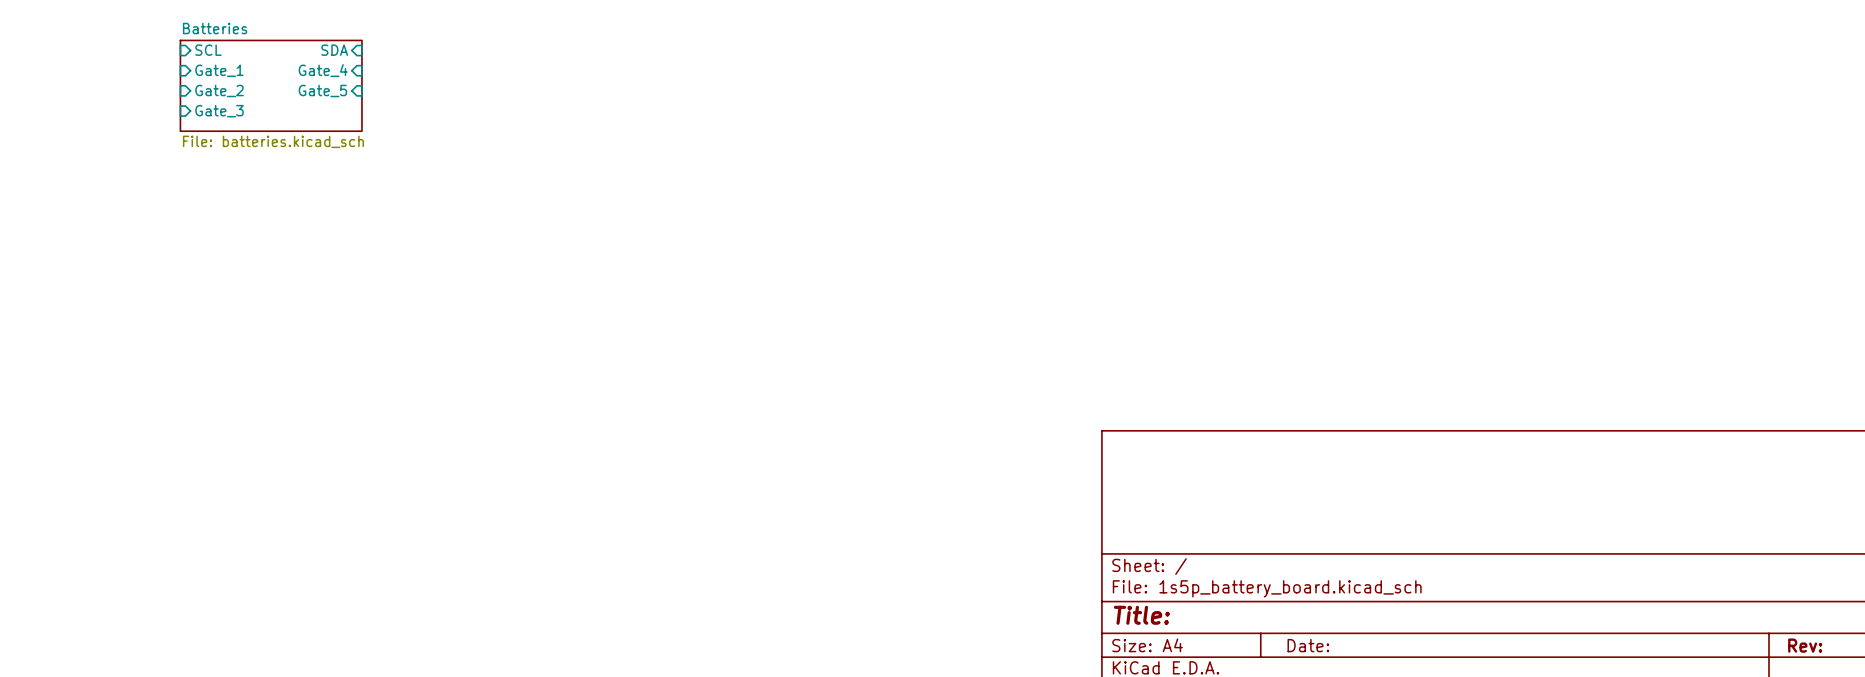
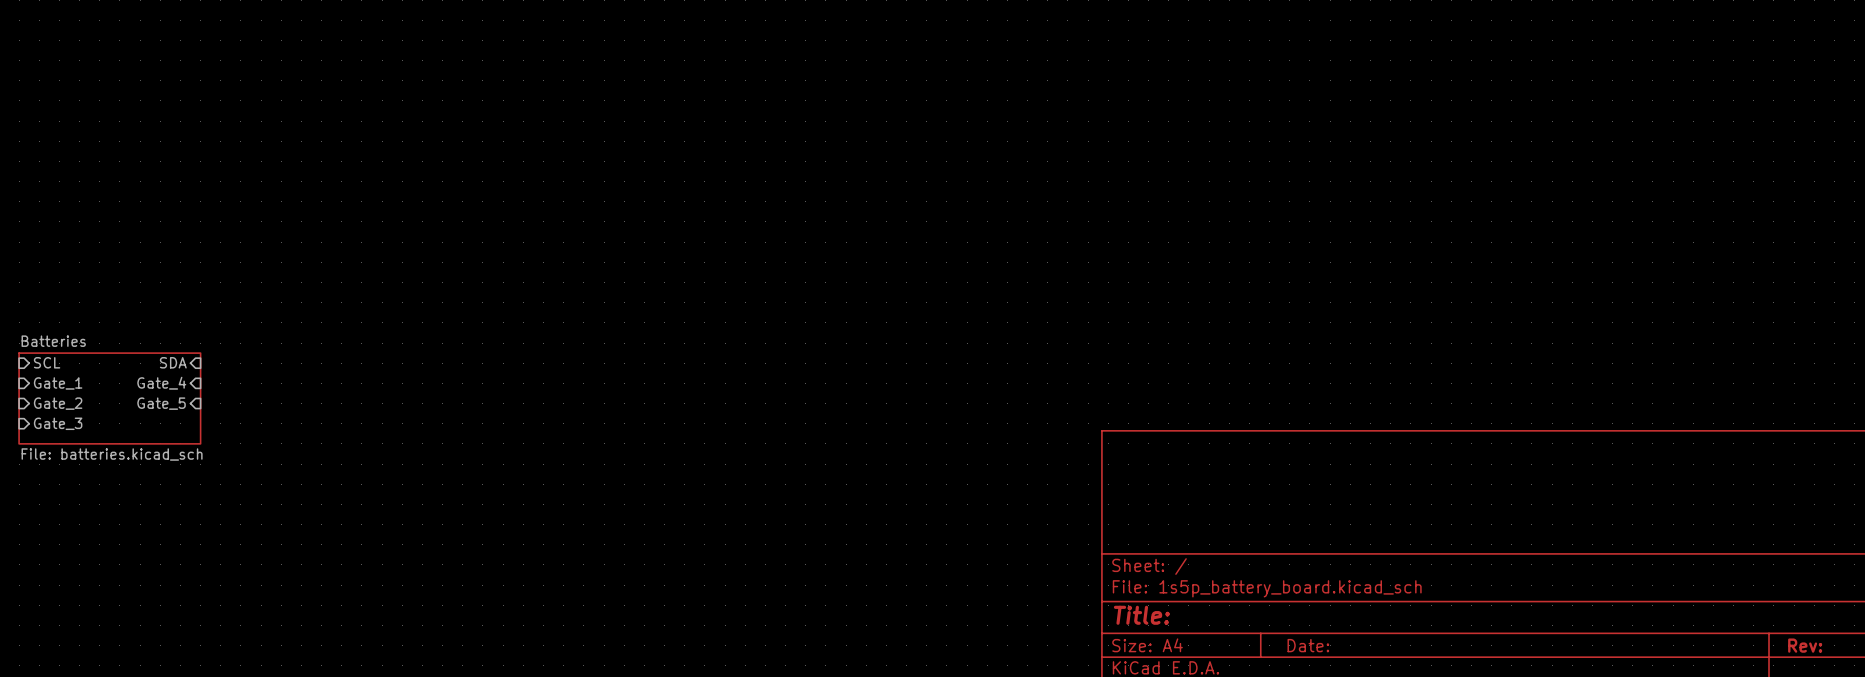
sheet pin: SCL (208, 50) -> none
sheet pin: SDA (334, 50) -> none
sheet pin: Gate_1 (219, 70) -> none
sheet pin: Gate_4 (323, 70) -> none
sheet Batteries: File: batteries.kicad_sch (271, 85) -> none
sheet pin: Gate_2 (219, 90) -> none
sheet pin: Gate_5 (322, 90) -> none
sheet pin: Gate_3 (219, 111) -> none
sheet pin: none -> SCL (47, 362)
sheet pin: none -> SDA (173, 362)
sheet pin: none -> Gate_1 (58, 383)
sheet pin: none -> Gate_4 (161, 383)
sheet Batteries: none -> File: batteries.kicad_sch (109, 398)
sheet pin: none -> Gate_2 (58, 403)
sheet pin: none -> Gate_5 (161, 403)
sheet pin: none -> Gate_3 (58, 423)

